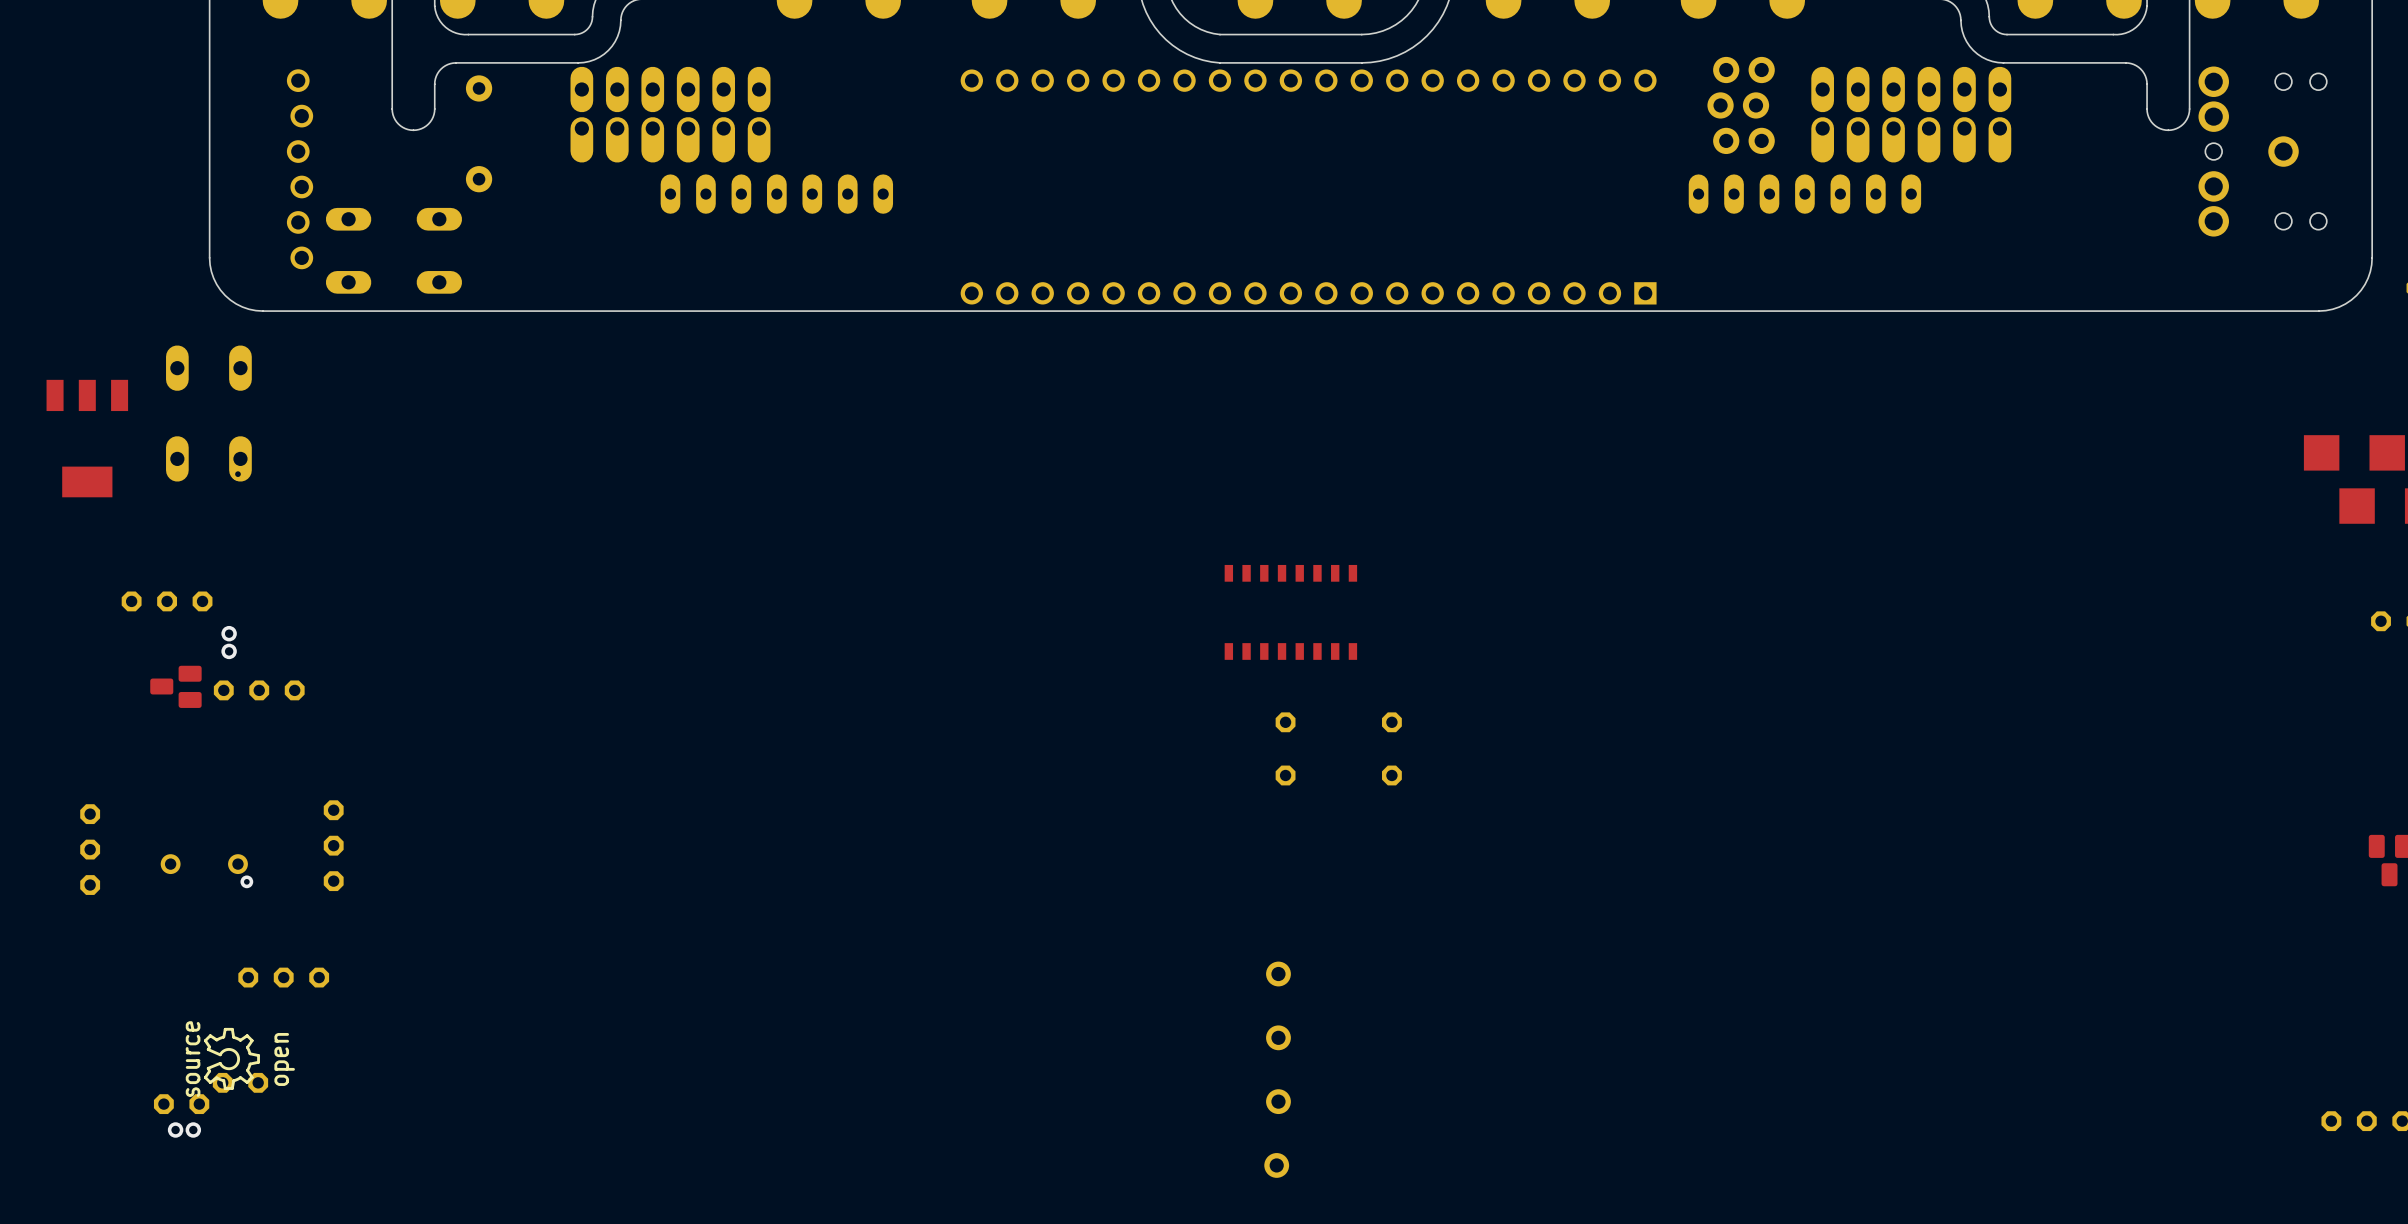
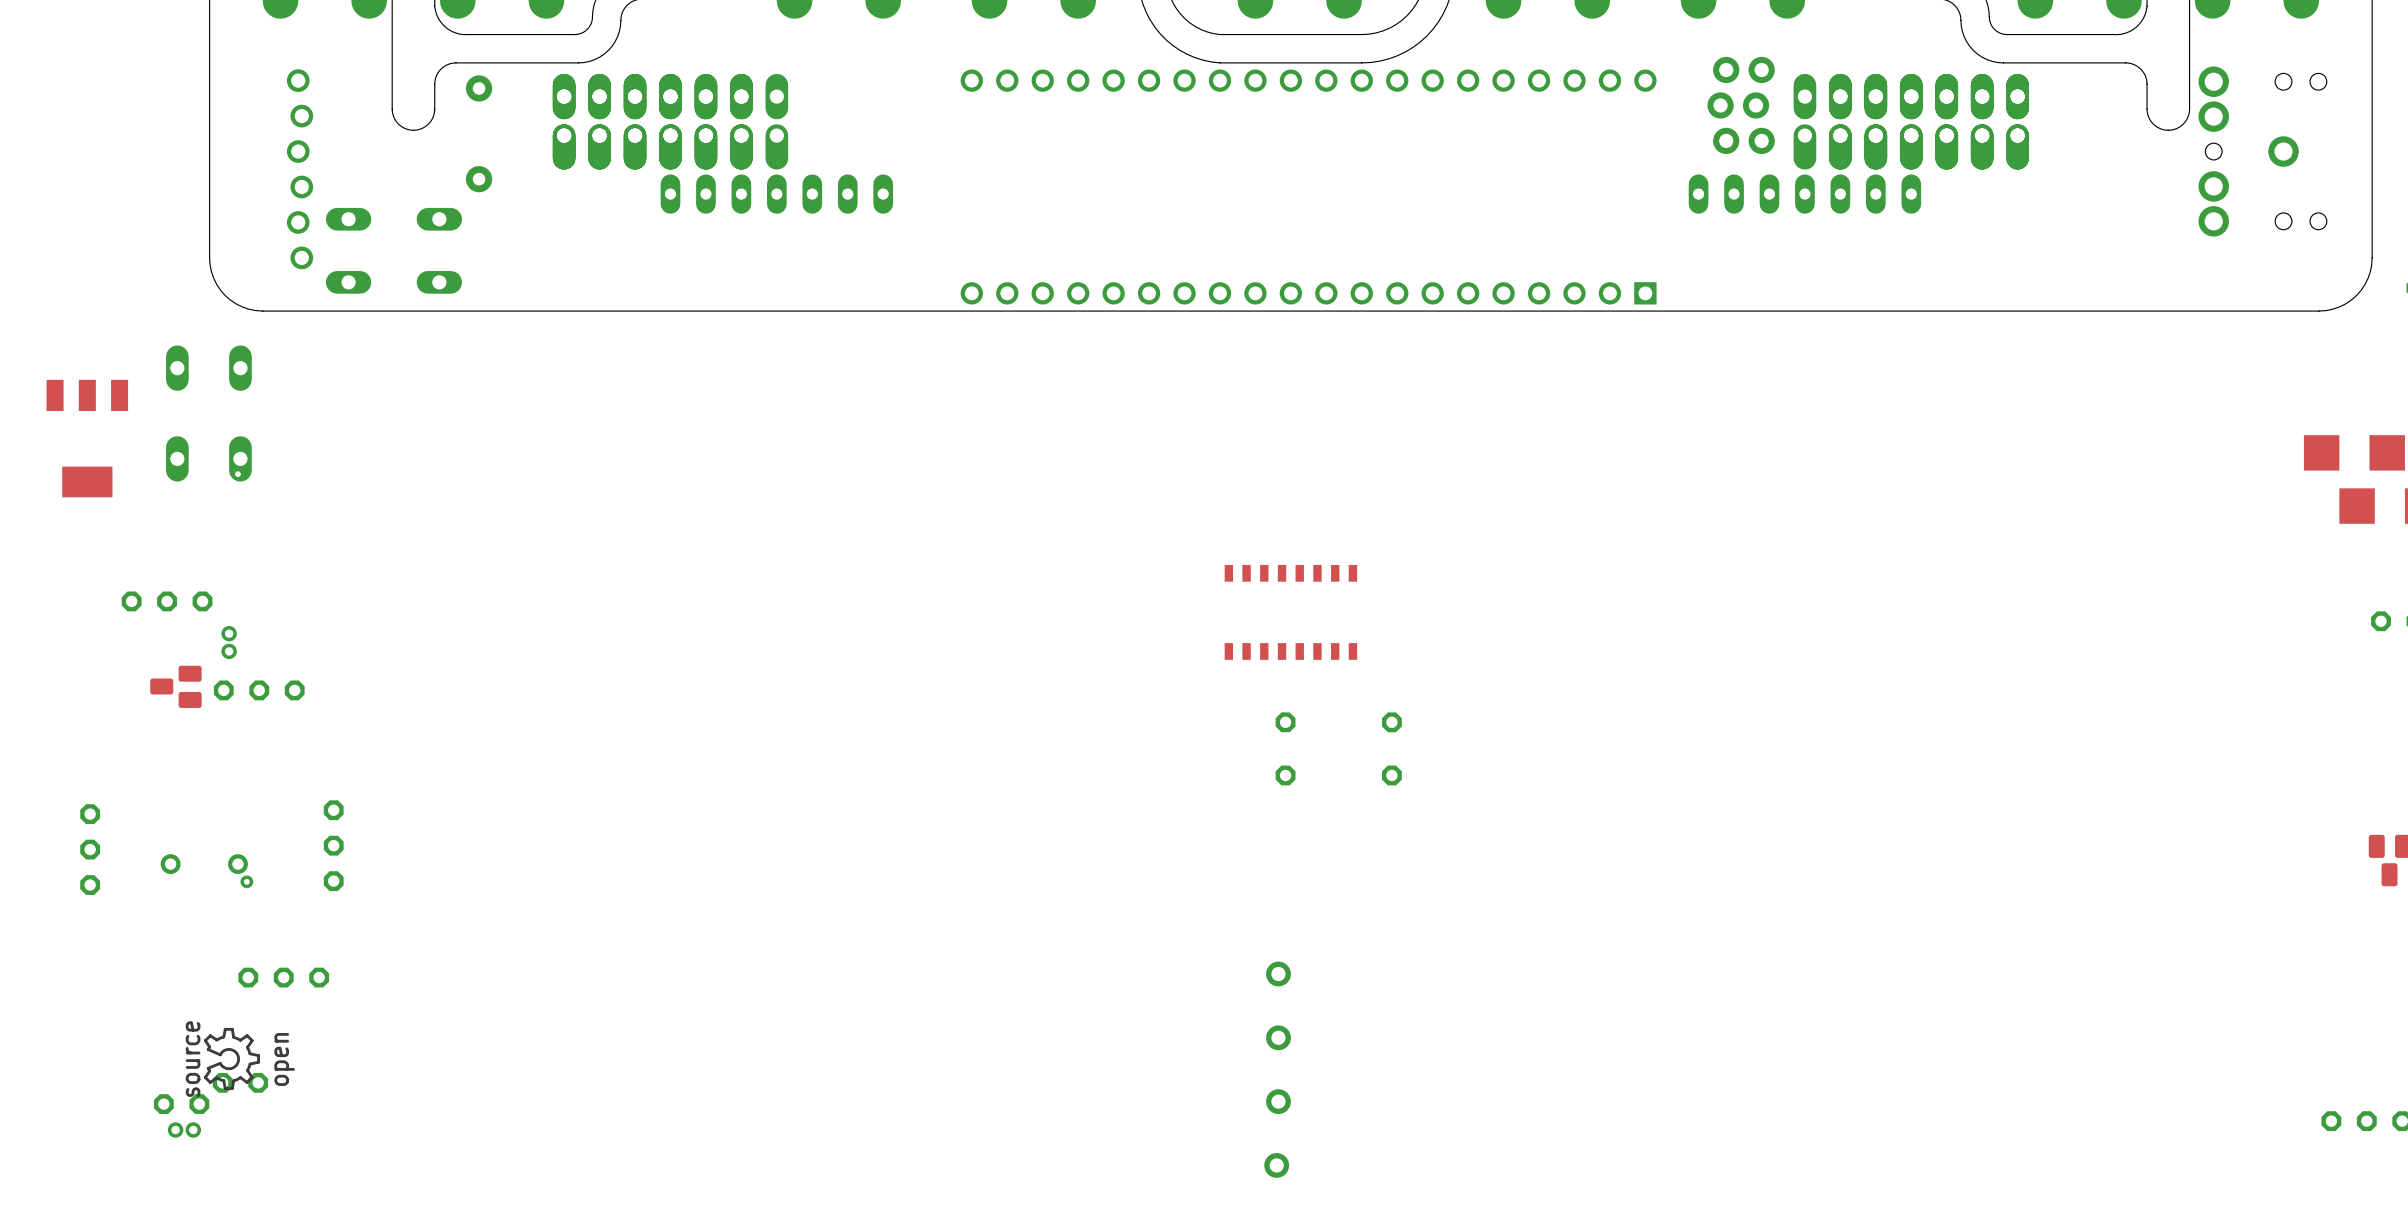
part footprint: [570, 66, 771, 163] -> [552, 73, 789, 170]
part footprint: [1811, 66, 2012, 163] -> [1793, 73, 2029, 170]
part: none -> (652, 121)
part: none -> (1929, 121)

